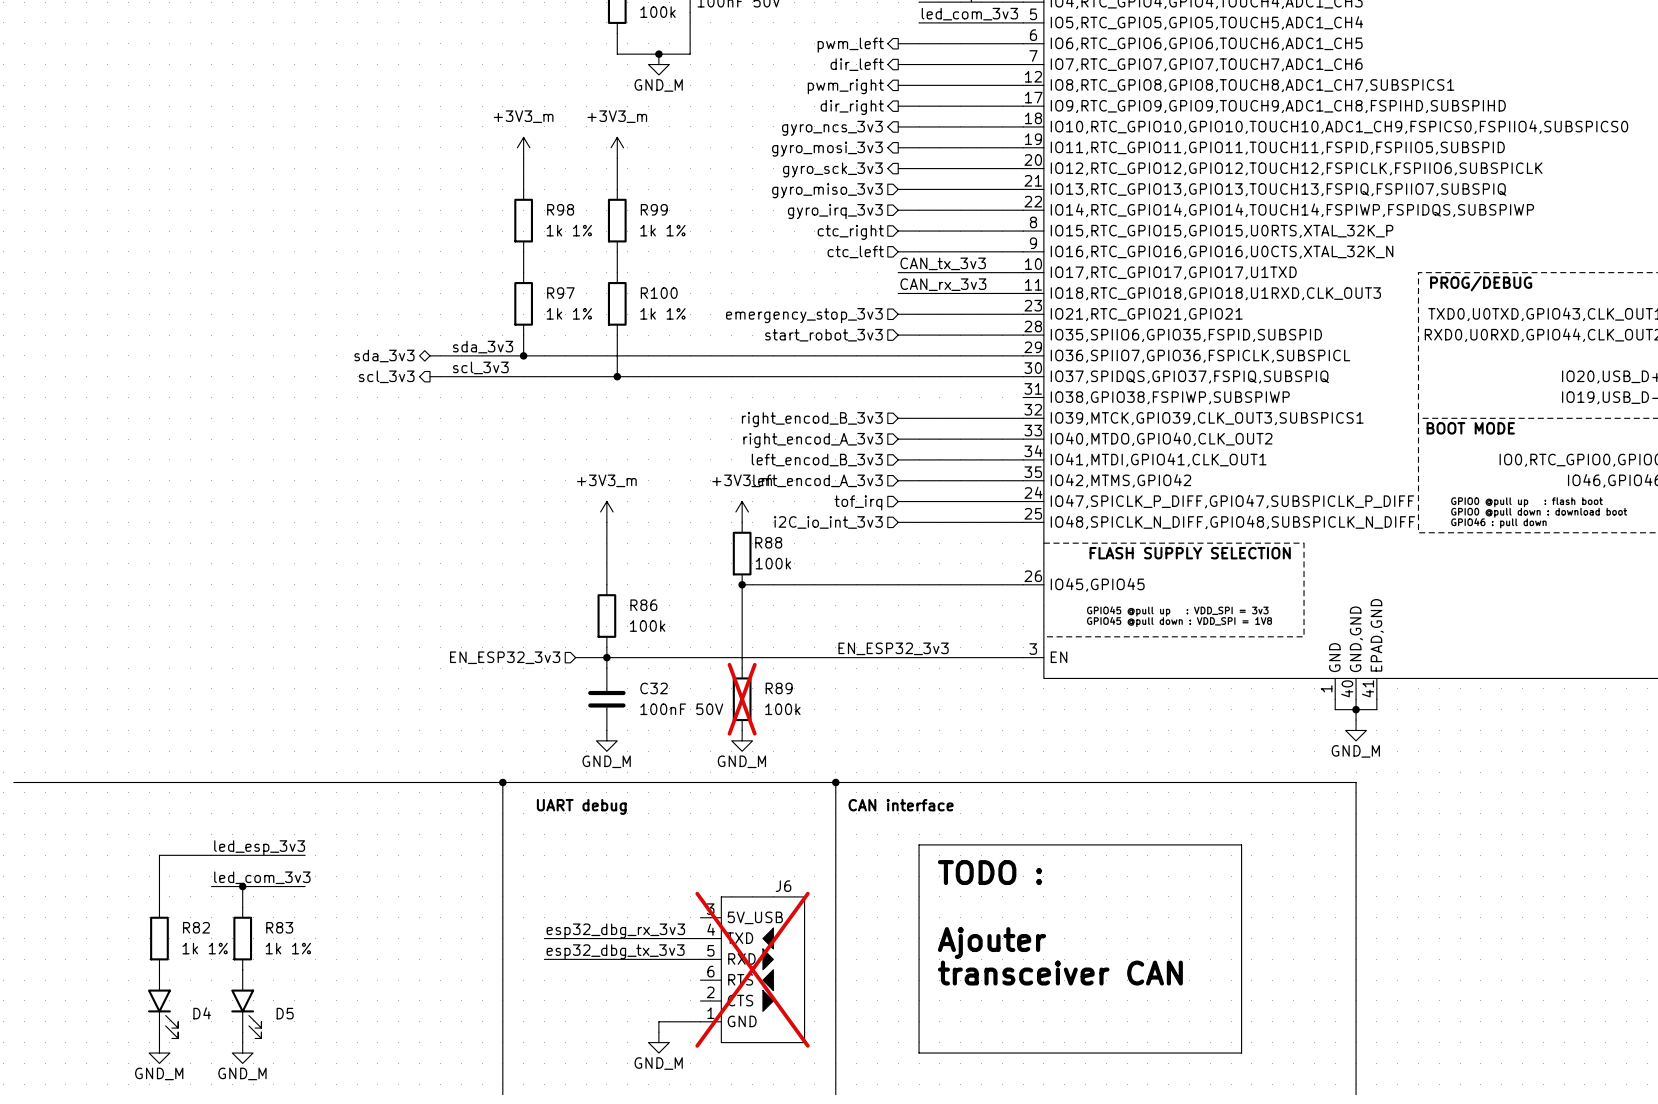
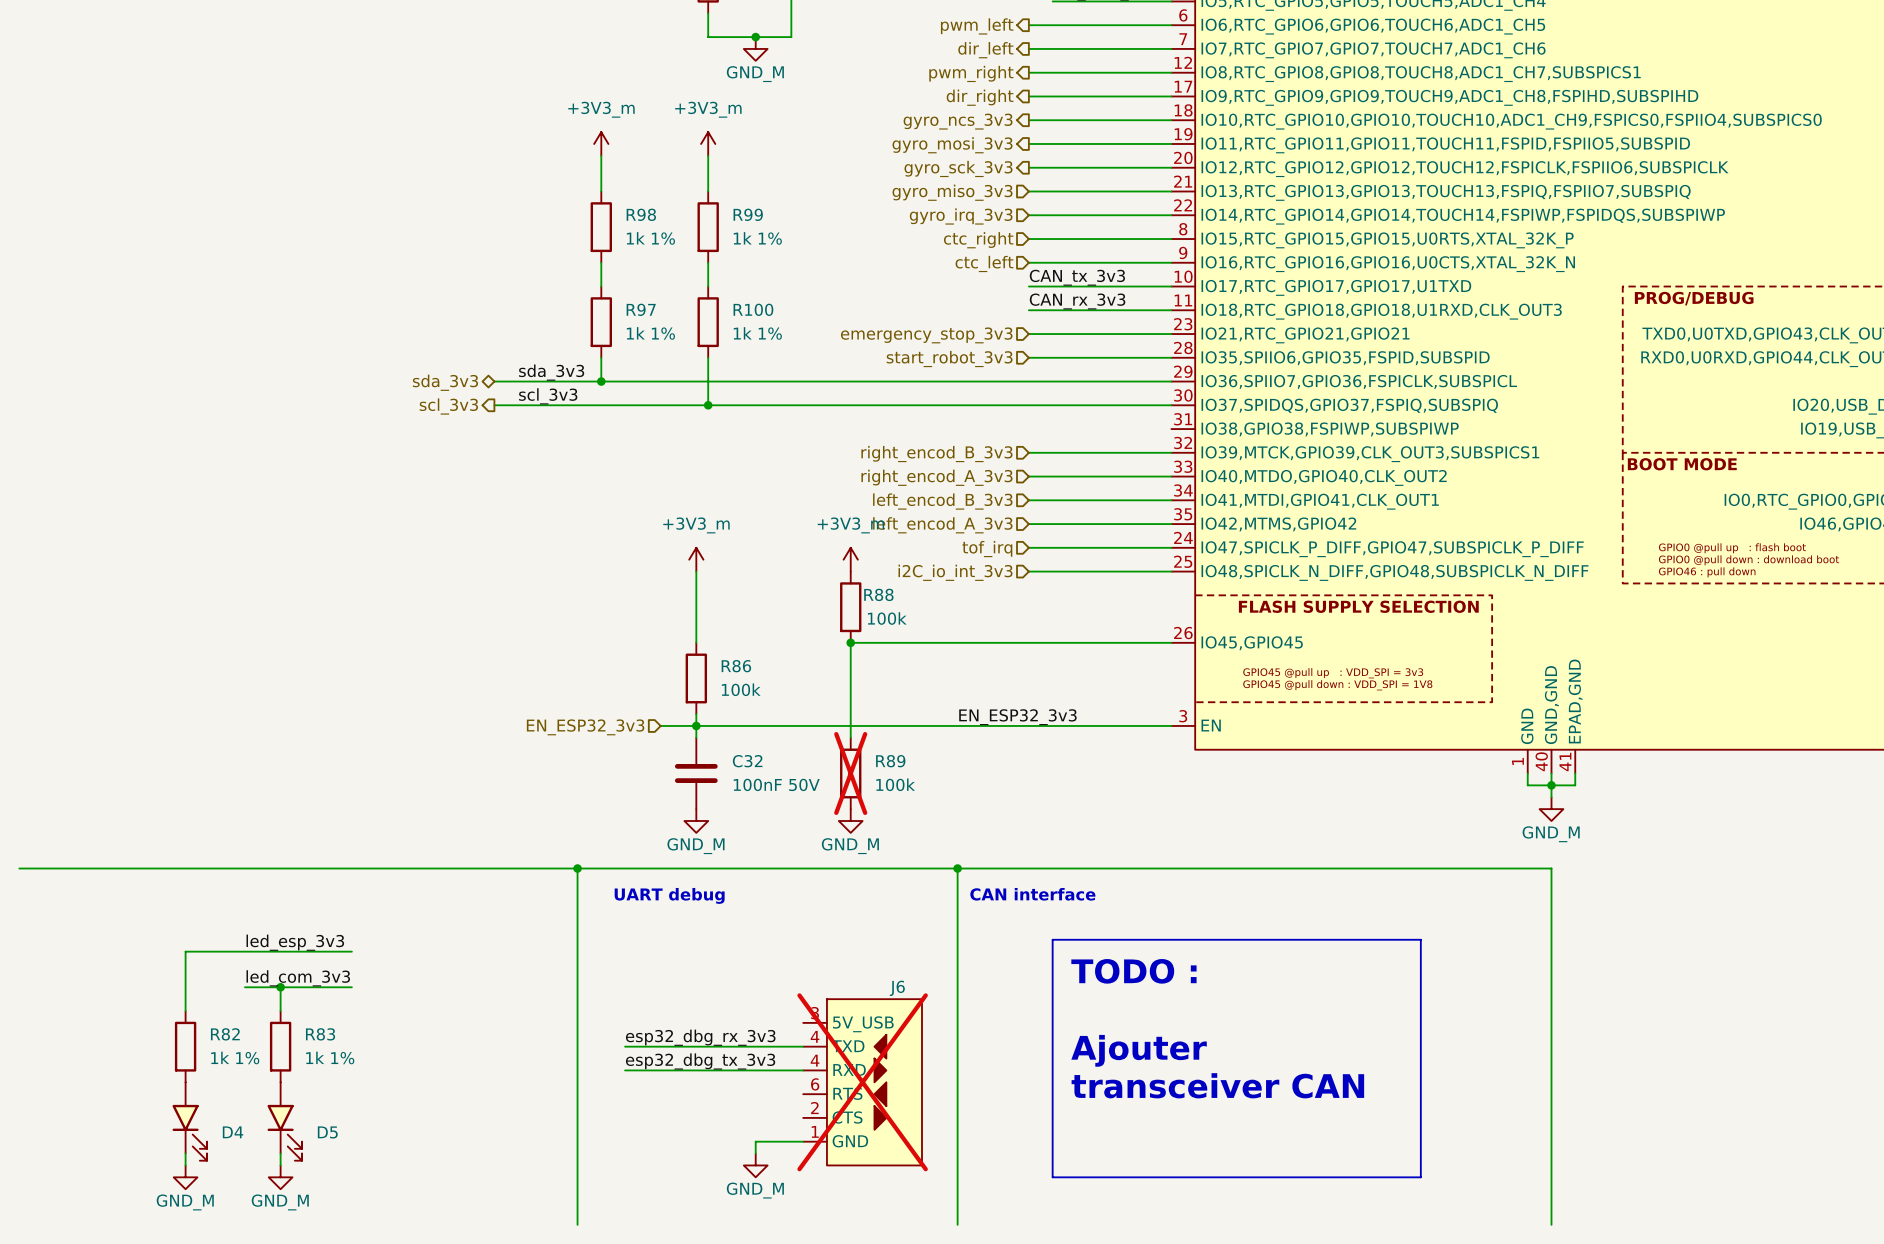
J6 pin number: 5 (710, 950) -> 4 (815, 1060)

